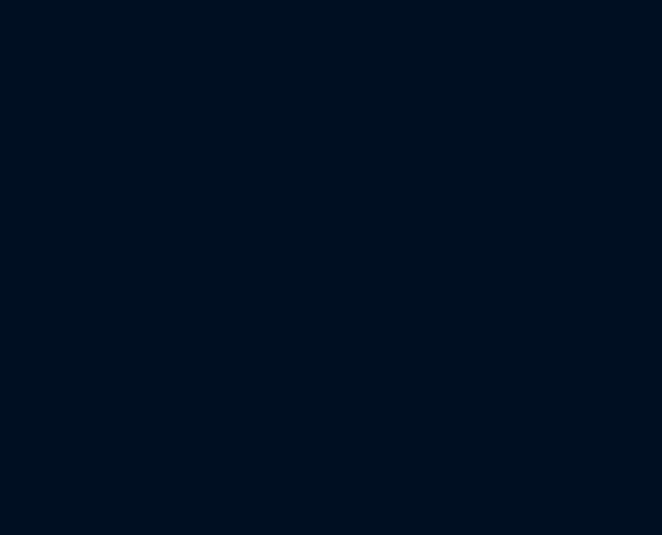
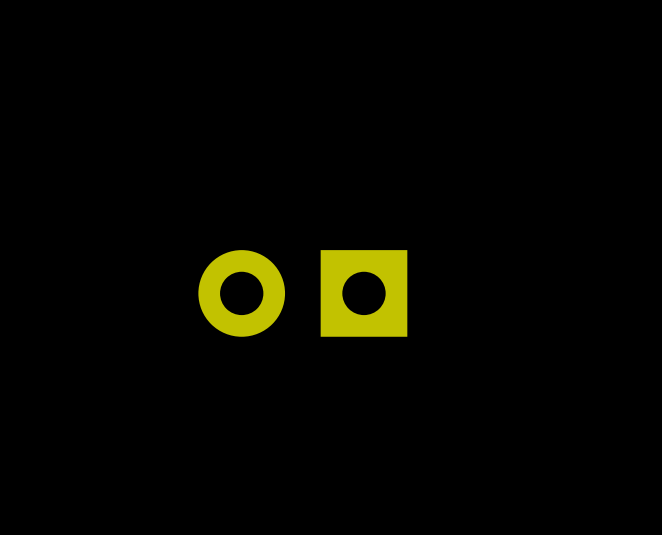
part: none -> (302, 293)

